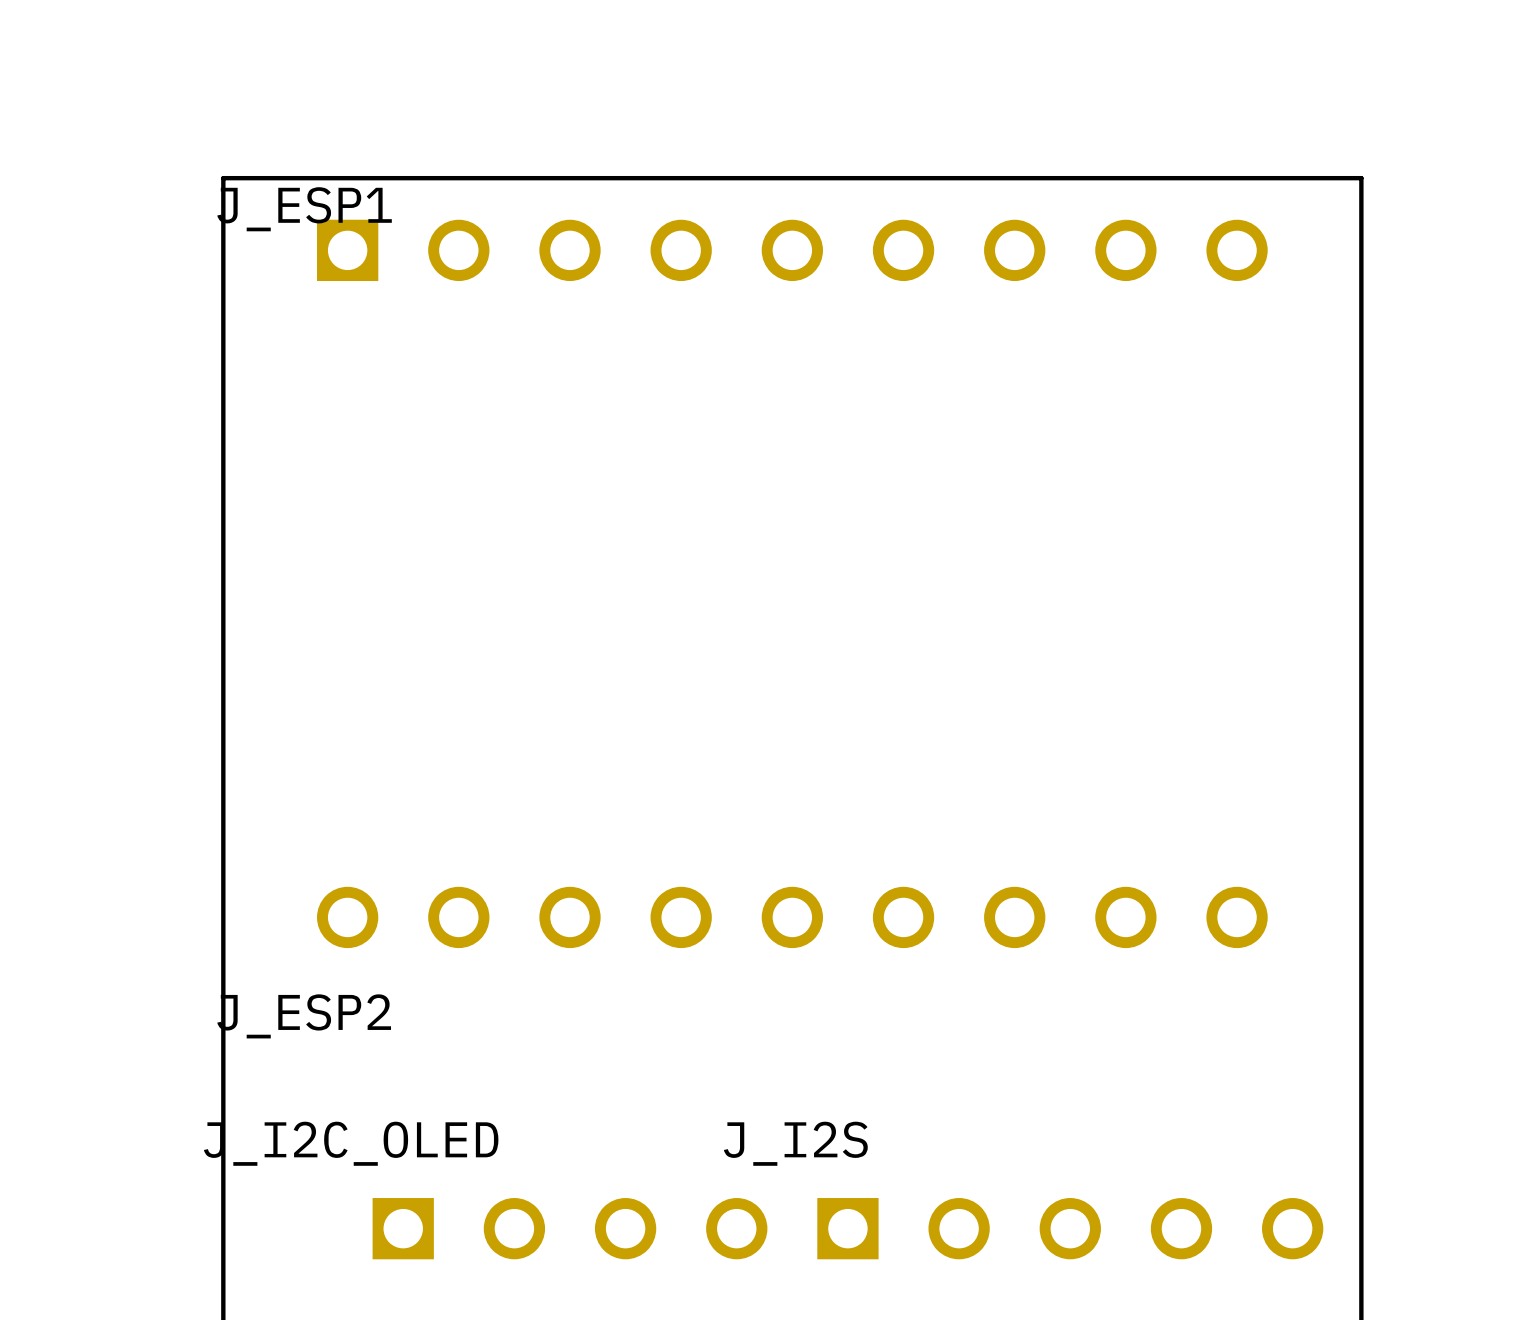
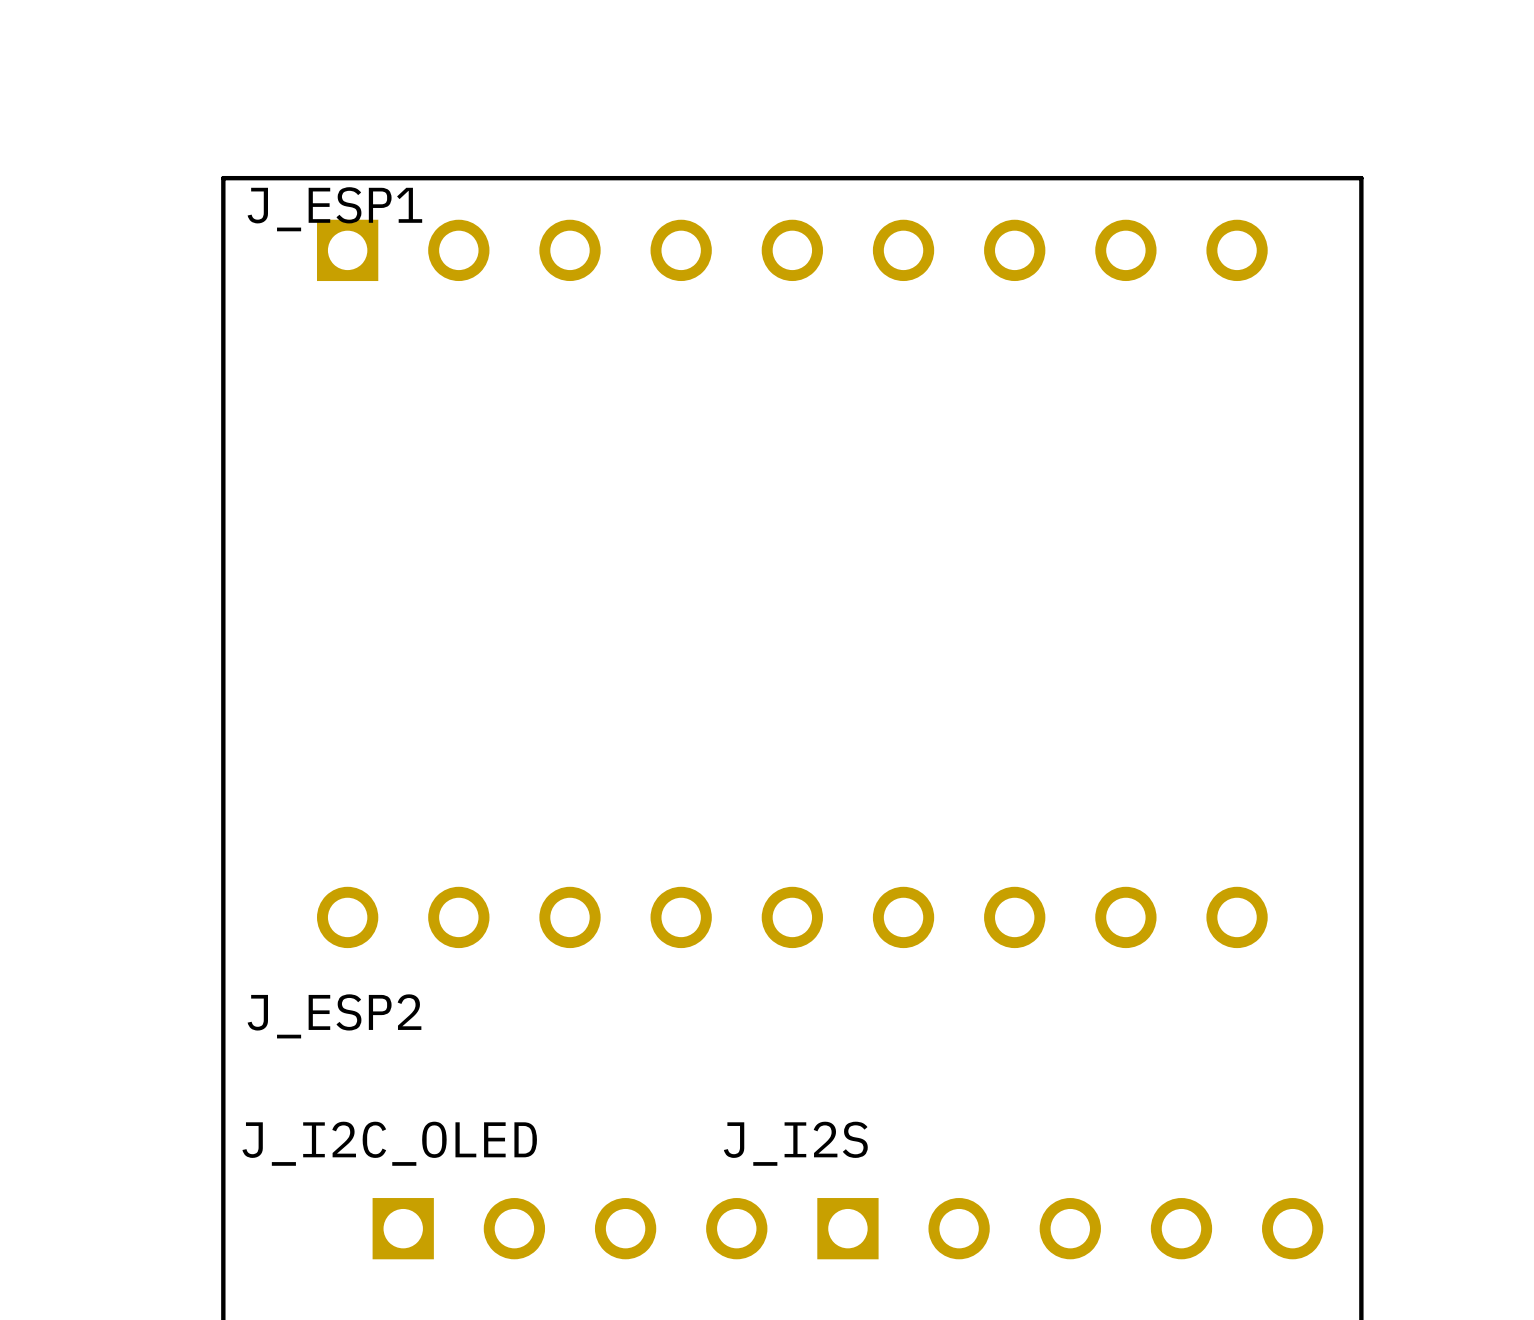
J_ESP1 name position: J_ESP1 (304, 209) -> J_ESP1 (334, 209)
J_ESP2 name position: J_ESP2 (304, 1016) -> J_ESP2 (334, 1016)
J_I2C_OLED name position: J_I2C_OLED (351, 1143) -> J_I2C_OLED (389, 1143)

